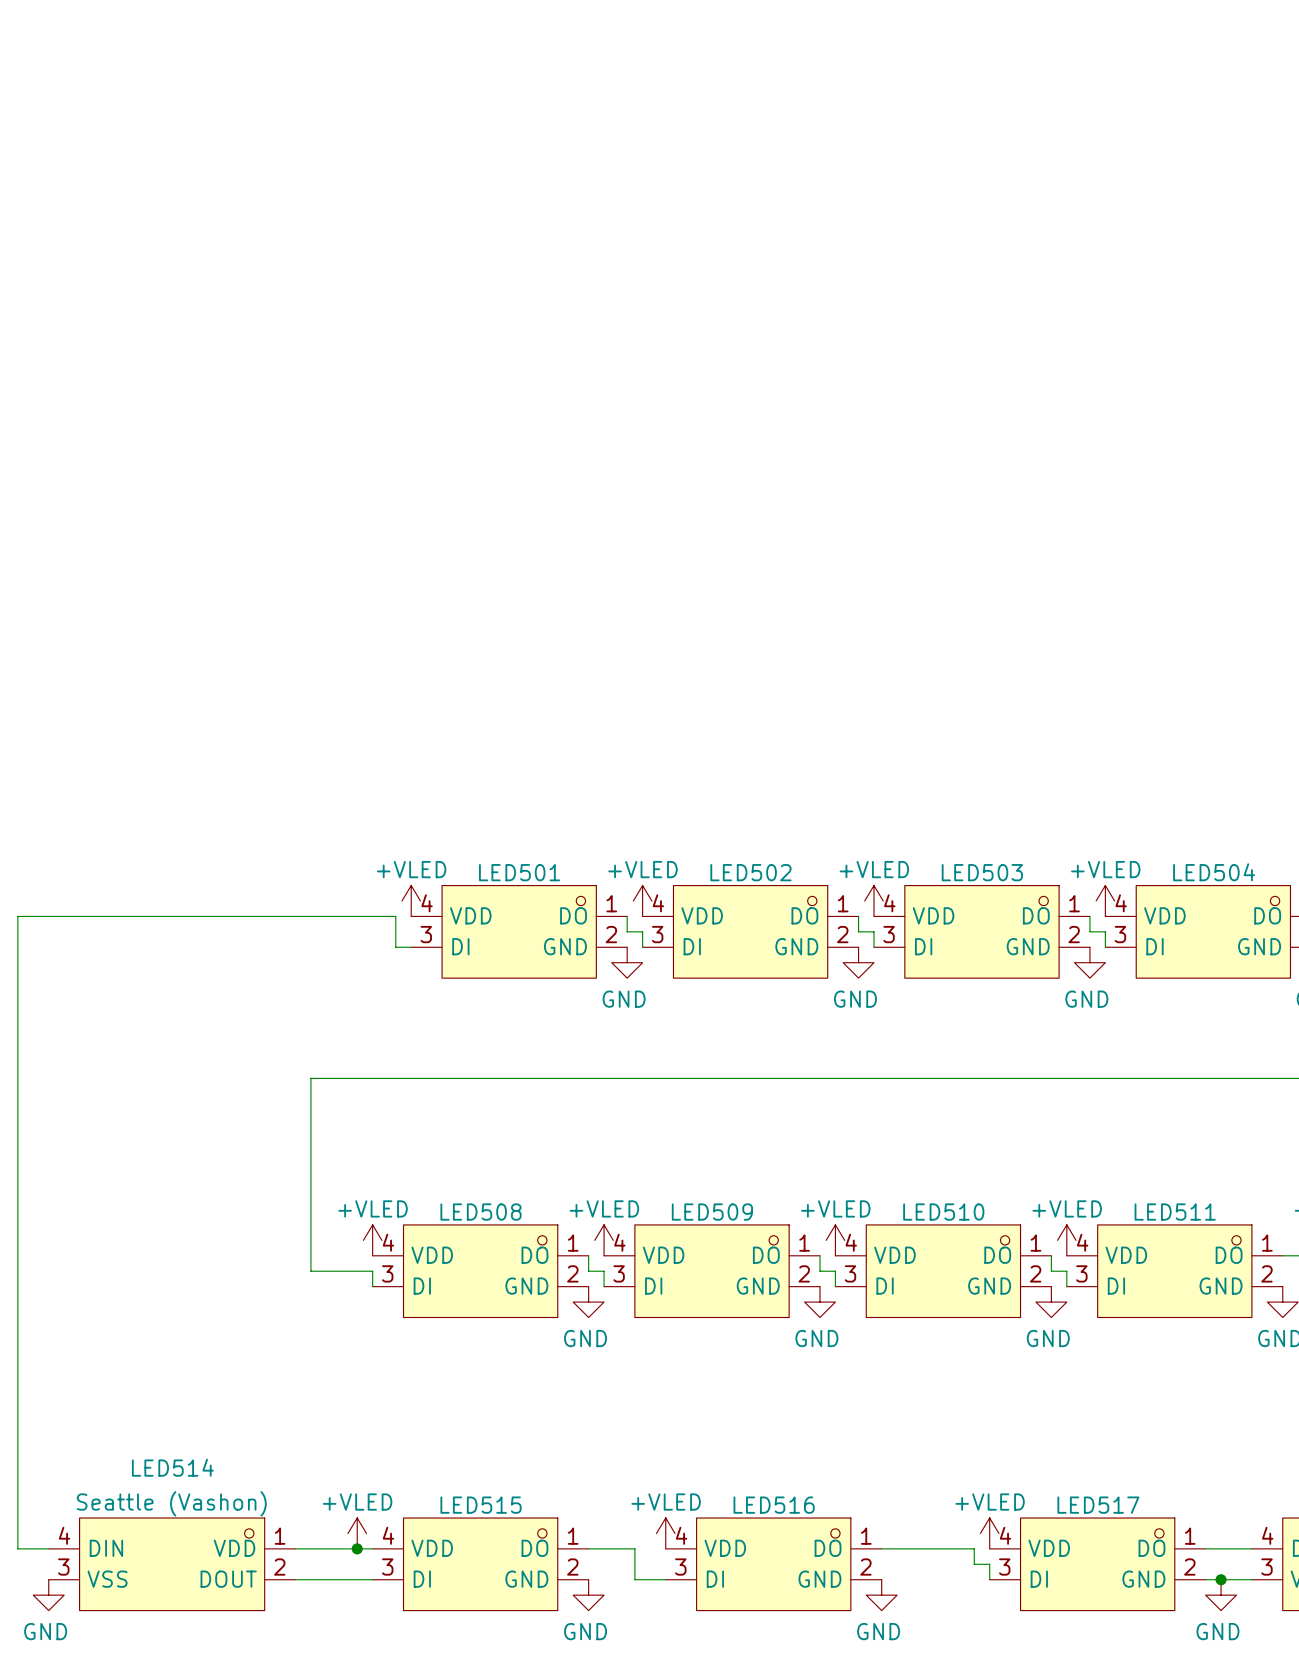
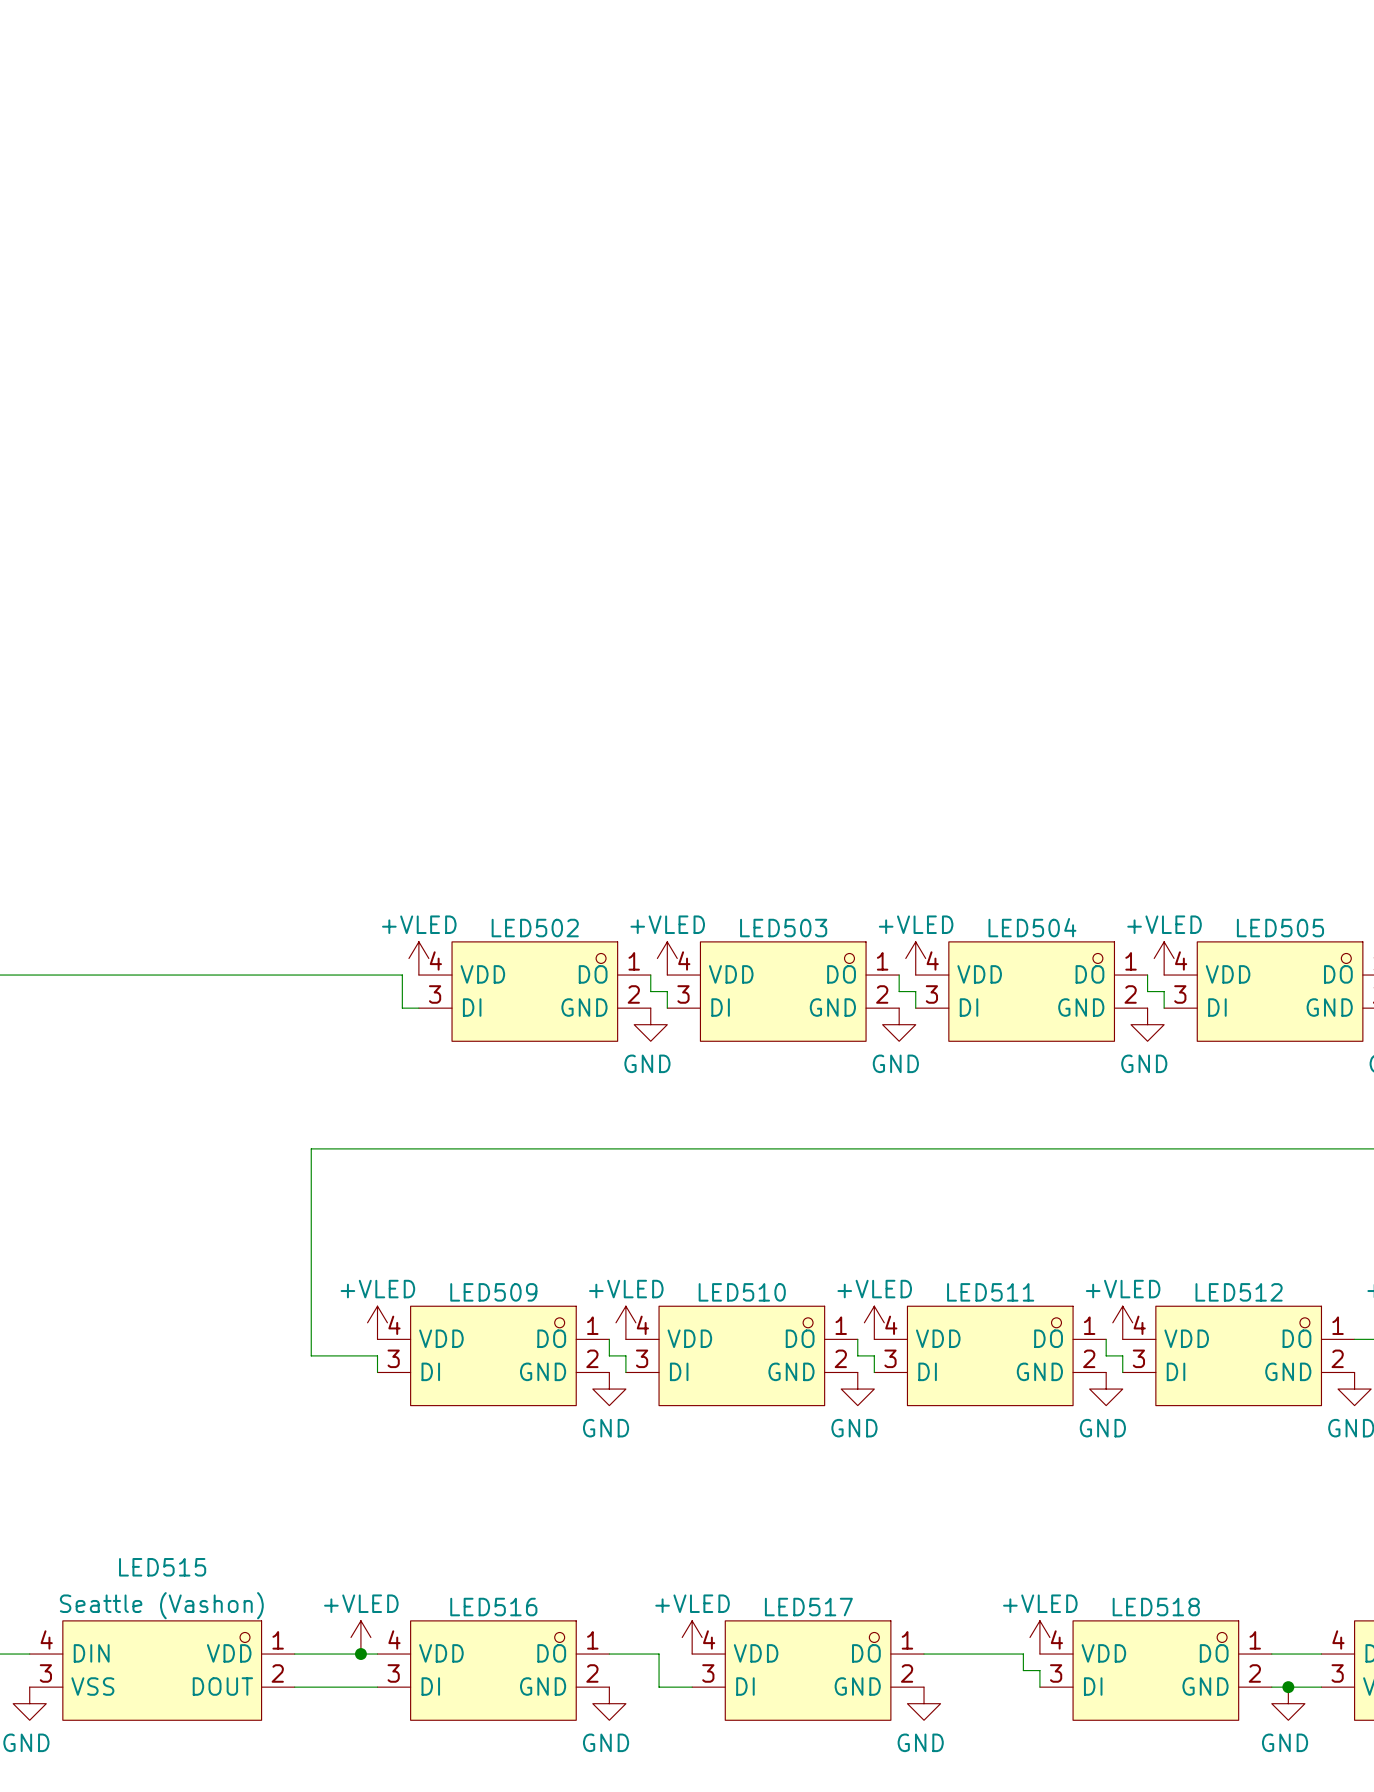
LED501 name: LED501 (519, 872) -> LED502 (535, 928)
LED502 name: LED502 (750, 872) -> LED503 (783, 928)
LED503 name: LED503 (982, 872) -> LED504 (1032, 927)
LED504 name: LED504 (1214, 872) -> LED505 (1280, 928)
LED508 name: LED508 (481, 1212) -> LED509 (493, 1292)
LED509 name: LED509 (712, 1212) -> LED510 (742, 1292)
LED510 name: LED510 (943, 1212) -> LED511 (990, 1292)
LED511 name: LED511 (1175, 1212) -> LED512 (1239, 1292)
LED514 name: LED514 (172, 1467) -> LED515 (162, 1567)
LED515 name: LED515 (481, 1505) -> LED516 (493, 1607)
LED516 name: LED516 (774, 1505) -> LED517 (808, 1607)
LED517 name: LED517 (1098, 1505) -> LED518 (1156, 1607)

